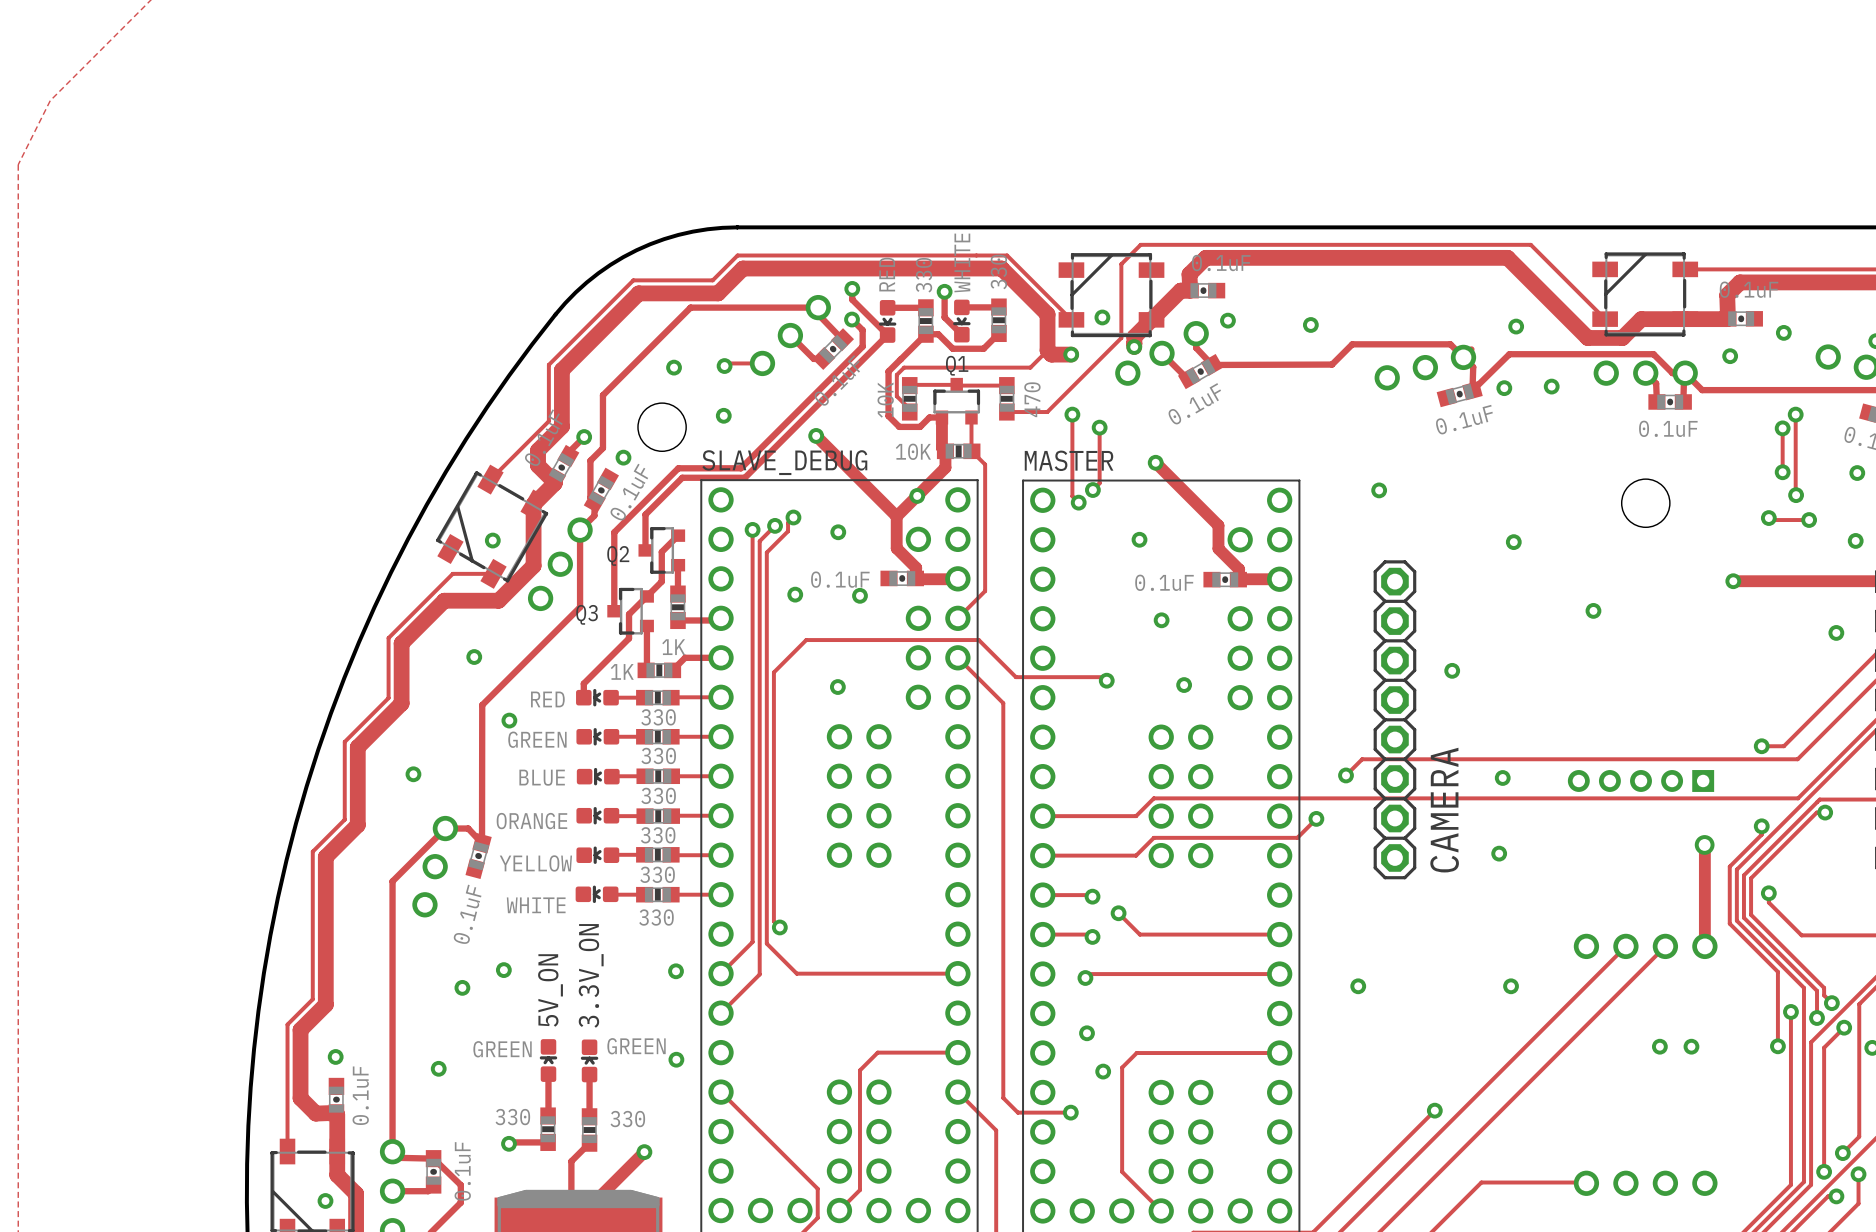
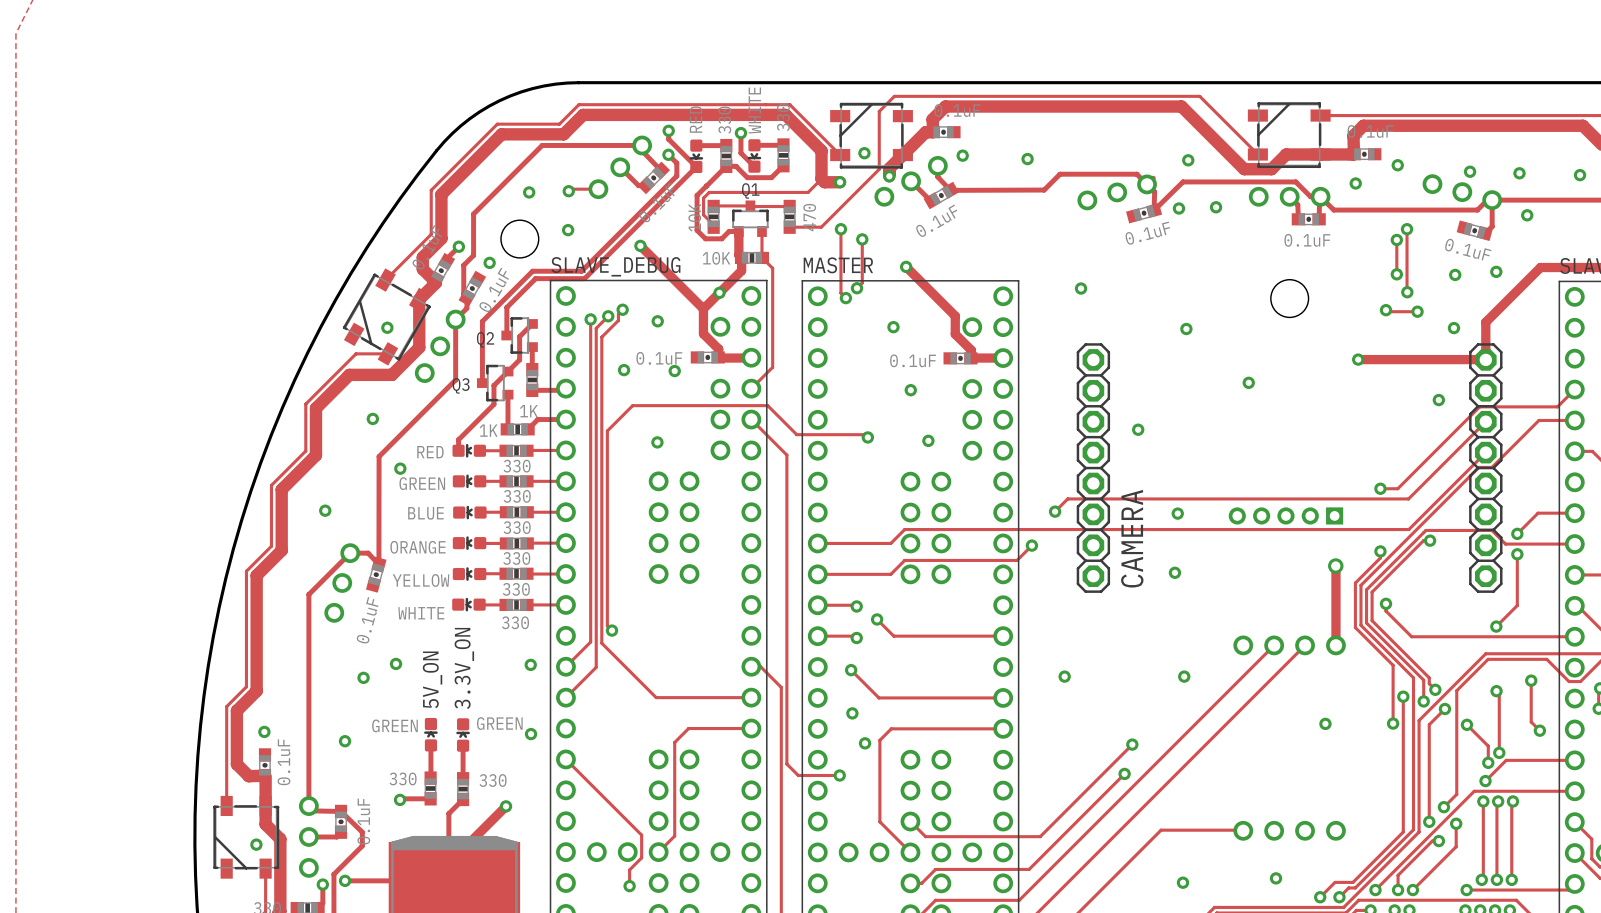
track: (796, 973) (957, 973) -> (625, 666) (656, 697) (751, 697)
track: (1279, 974) (1089, 974) (1085, 978) -> (1003, 697) (878, 697) (851, 670)
via: (1659, 1046) -> none
track: none -> (1132, 744) (1040, 836) (925, 836) (910, 821)
via: none -> (1132, 744)
track: (957, 1092) (996, 1130) -> (751, 666) (760, 666) (781, 687) (781, 789)

